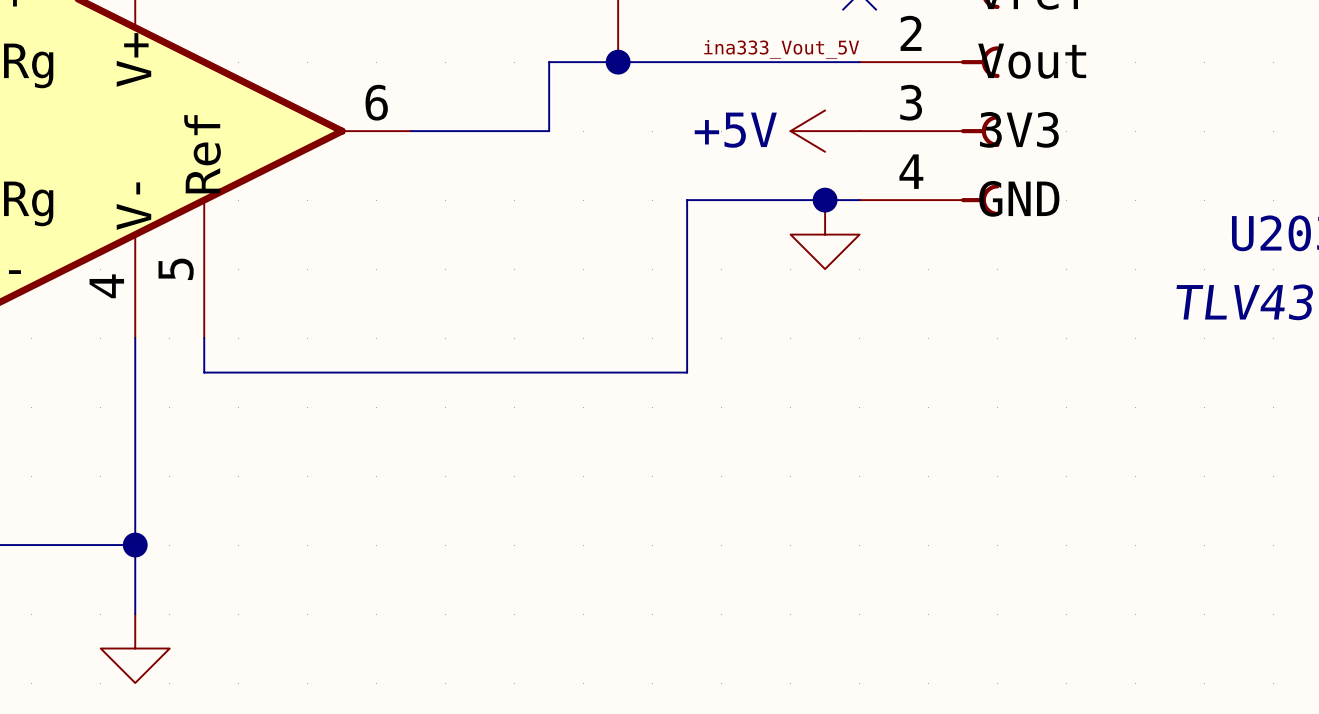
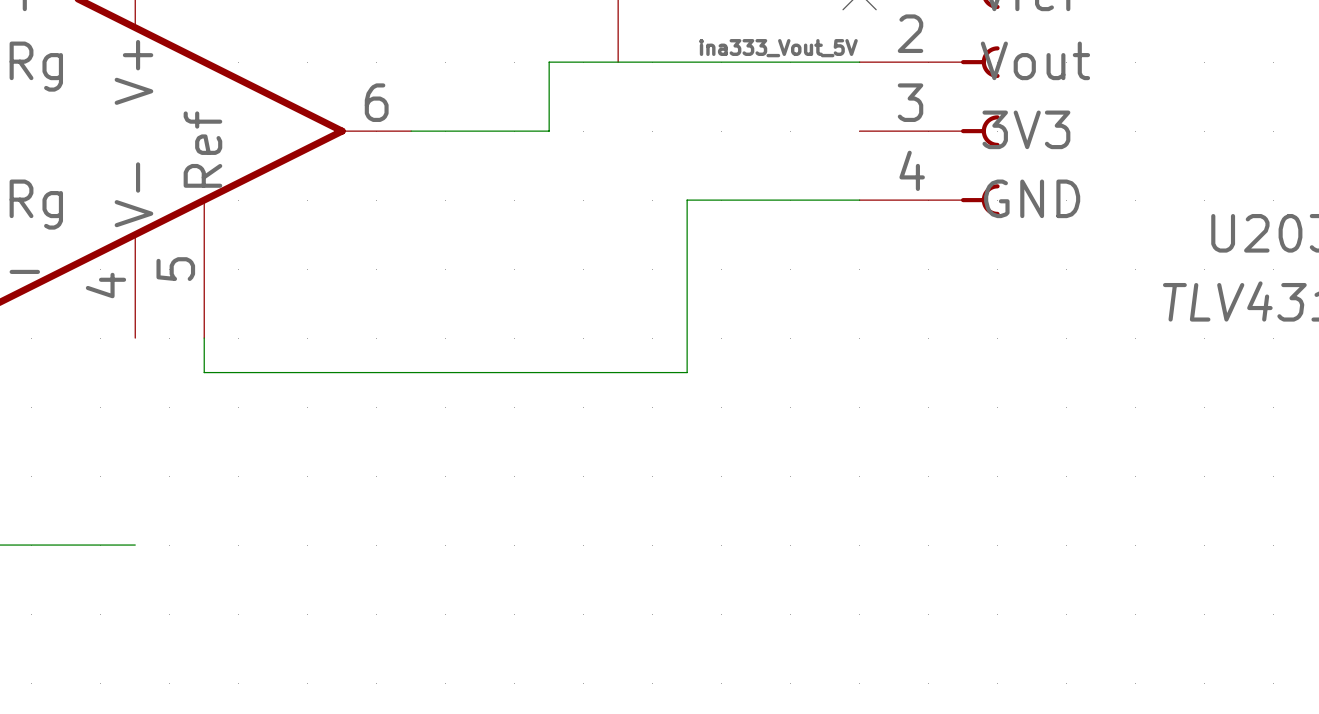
junction: (618, 62) -> none
power symbol: +5V (825, 131) -> none
junction: (825, 200) -> none
power symbol: (825, 234) -> none
wire: (135, 338) (135, 614) -> none
junction: (135, 545) -> none
power symbol: (135, 648) -> none

